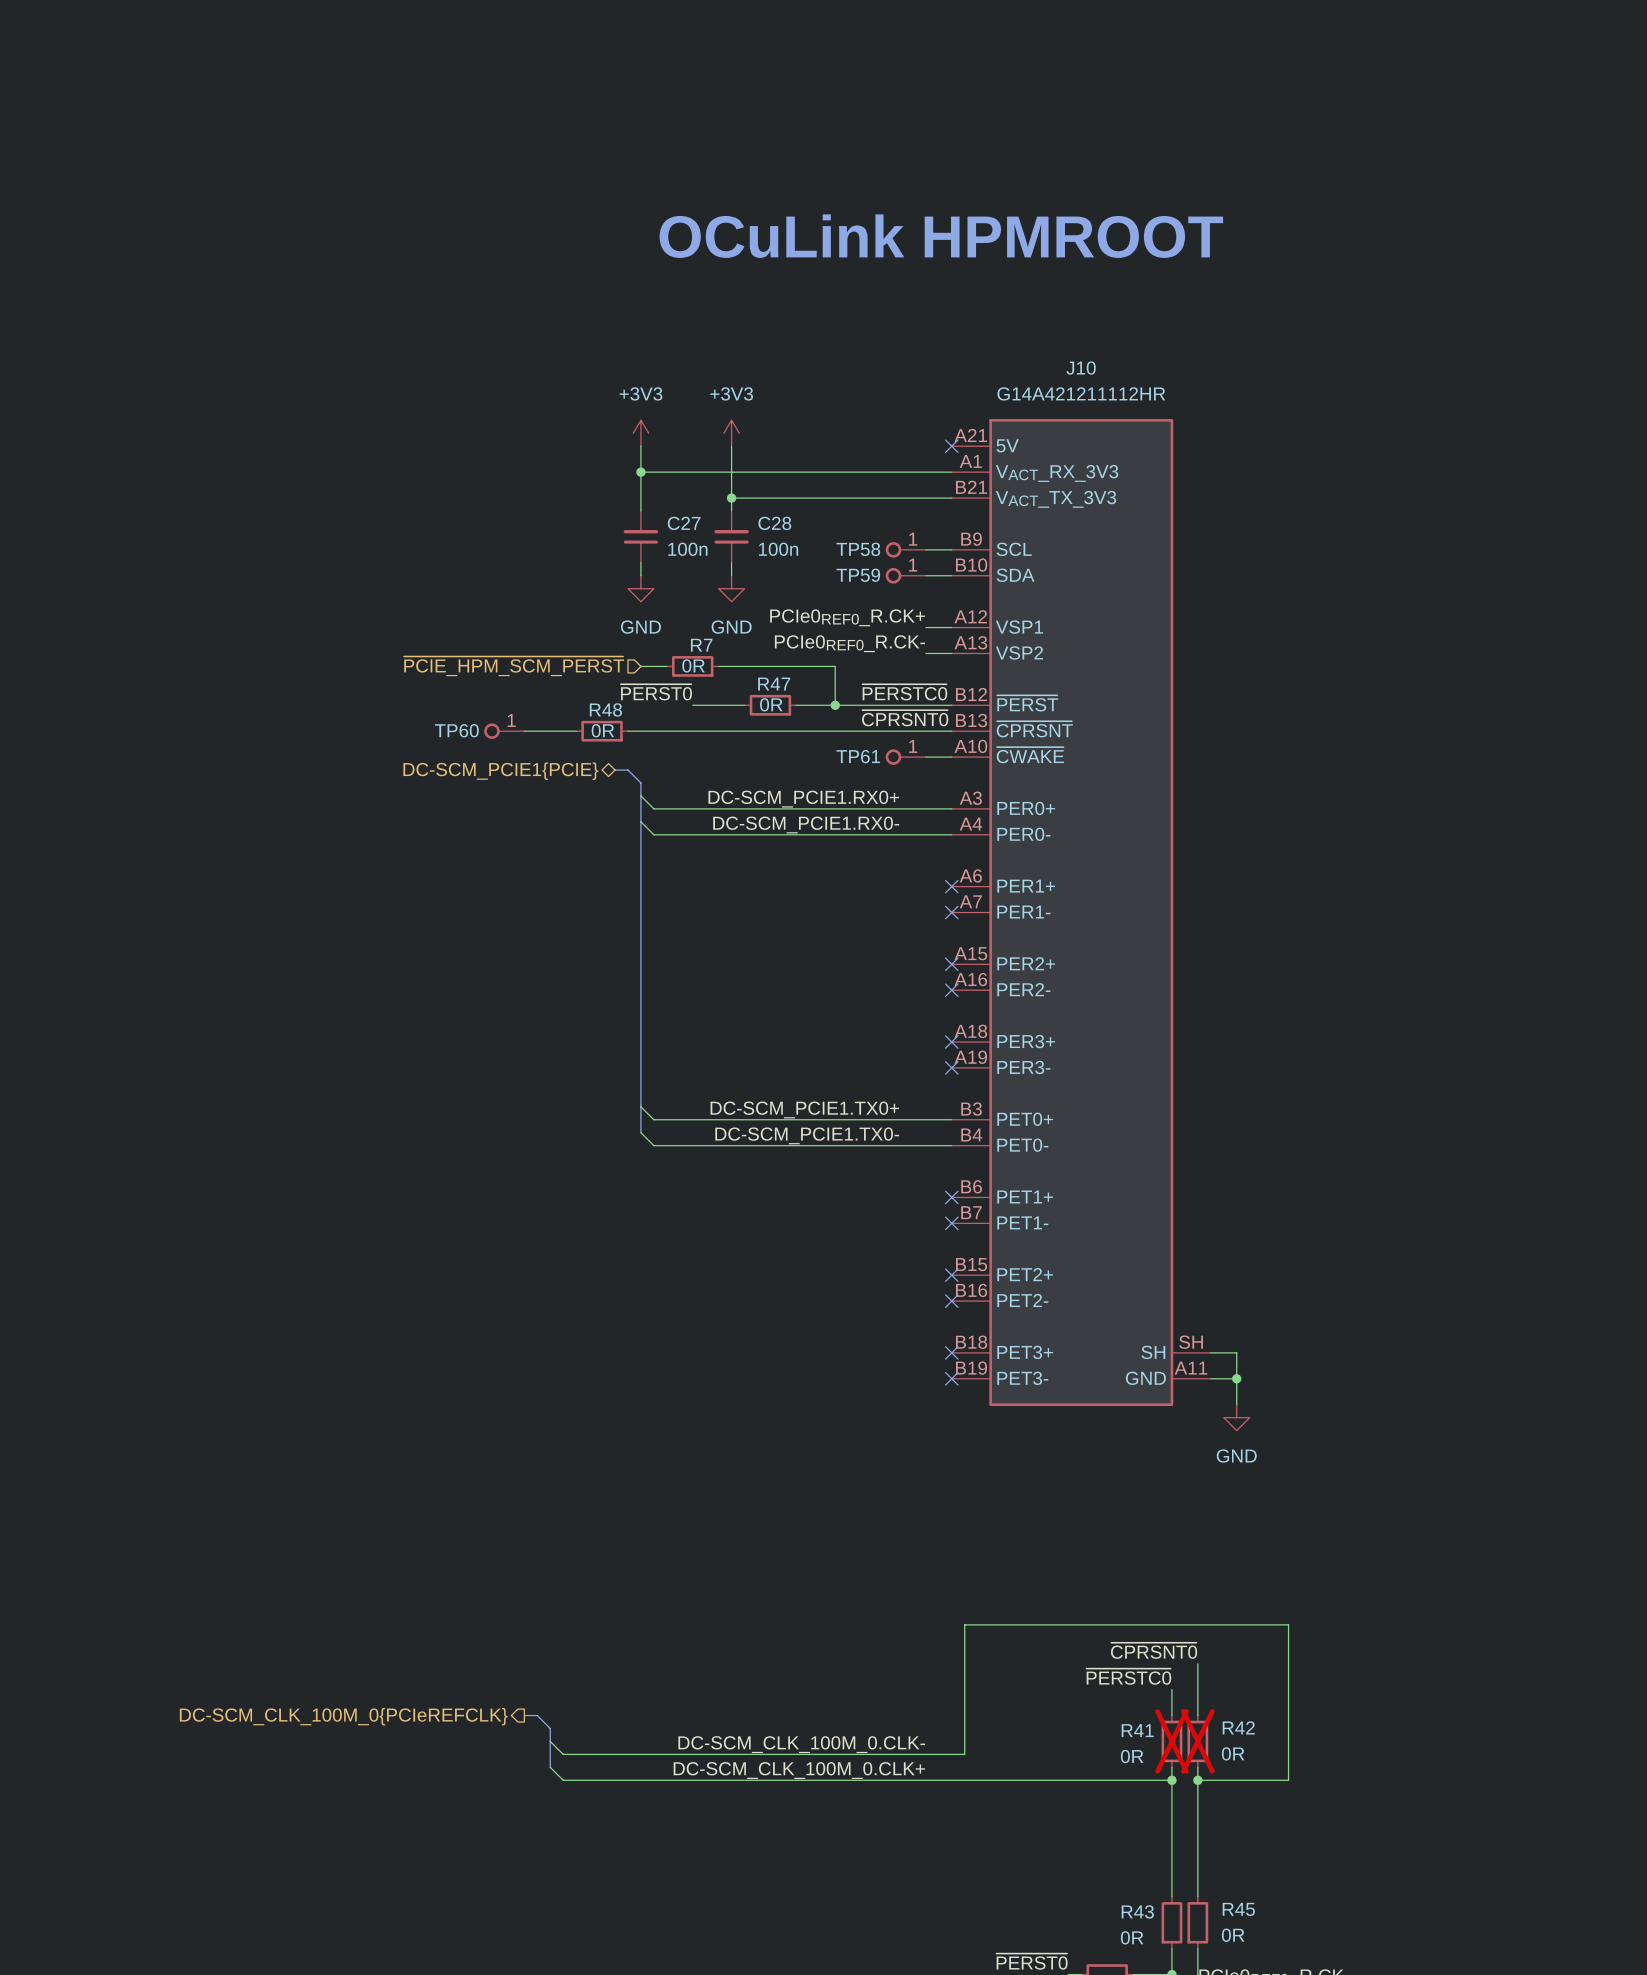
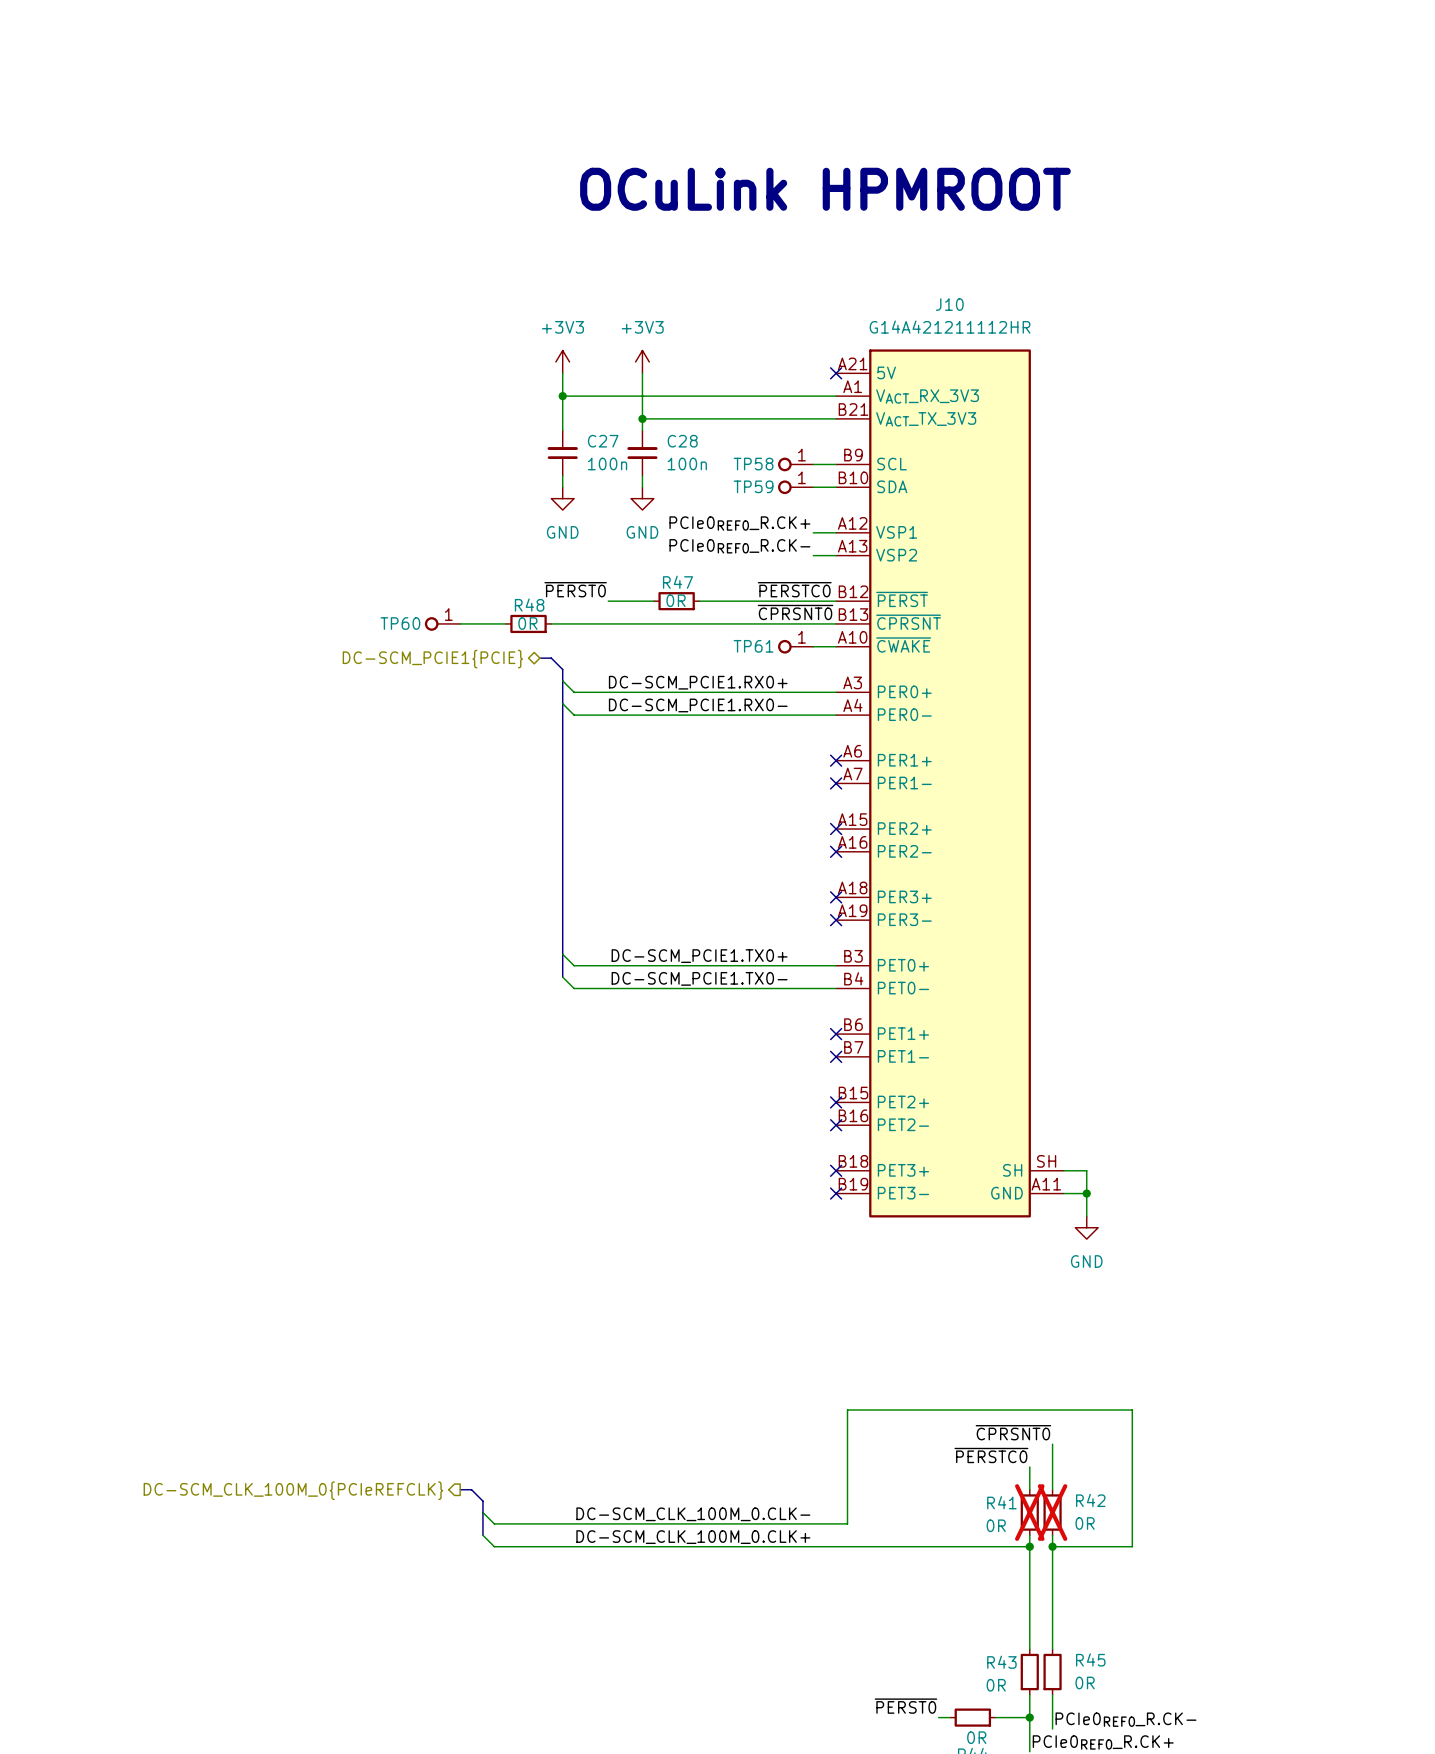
hierarchical label: ~{PCIE_HPM_SCM_PERST} (514, 666) -> none
wire: (640, 666) (666, 666) -> none
R7: (692, 666) -> none
wire: (718, 666) (835, 666) (835, 705) -> none
junction: (835, 705) -> none

